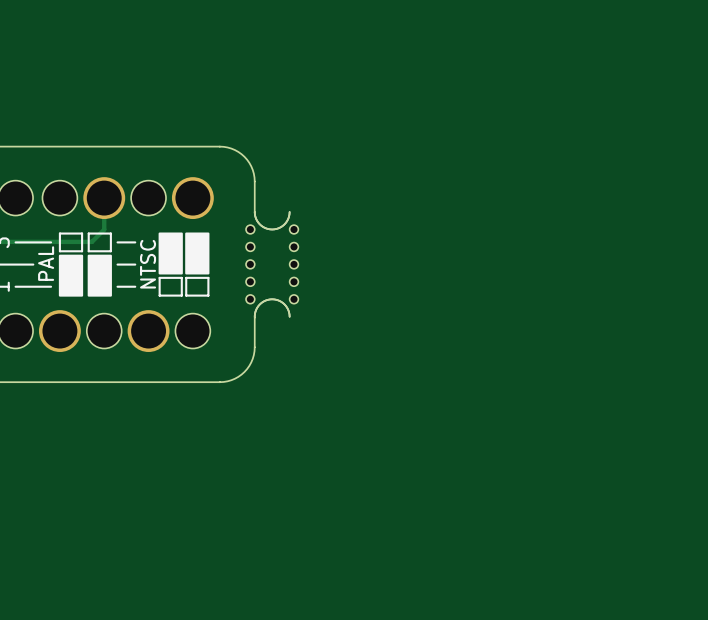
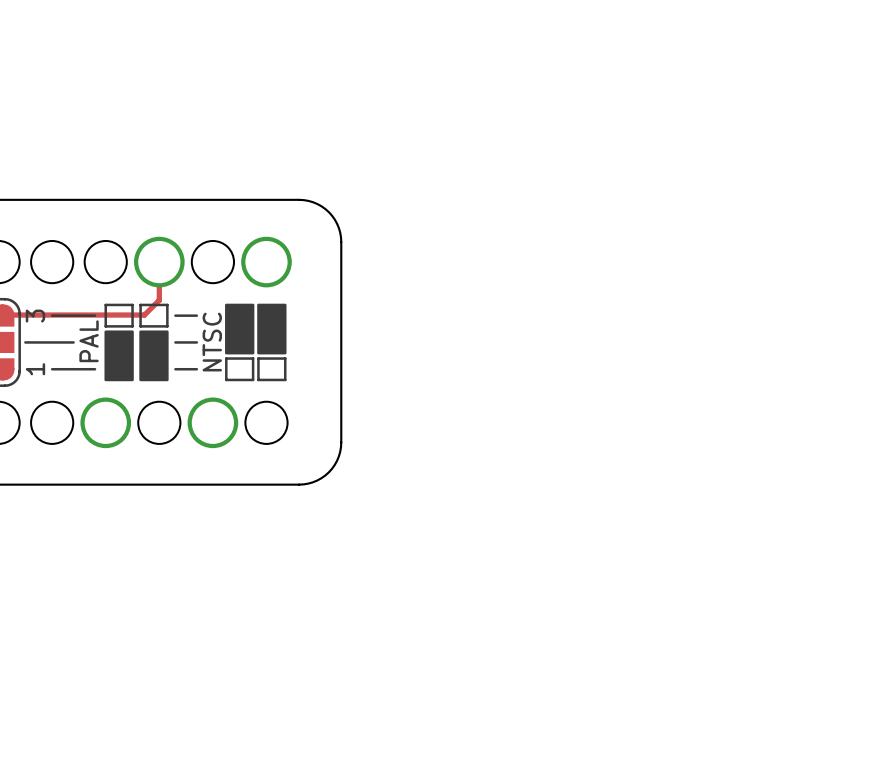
board edge: (254, 212) (256, 220) (260, 225) (272, 229) (283, 225) (287, 220) (289, 212) -> none
part: (272, 264) -> none
board edge: (289, 316) (287, 308) (283, 303) (271, 299) (265, 300) (258, 305) (254, 317) -> (341, 278) (341, 406)

